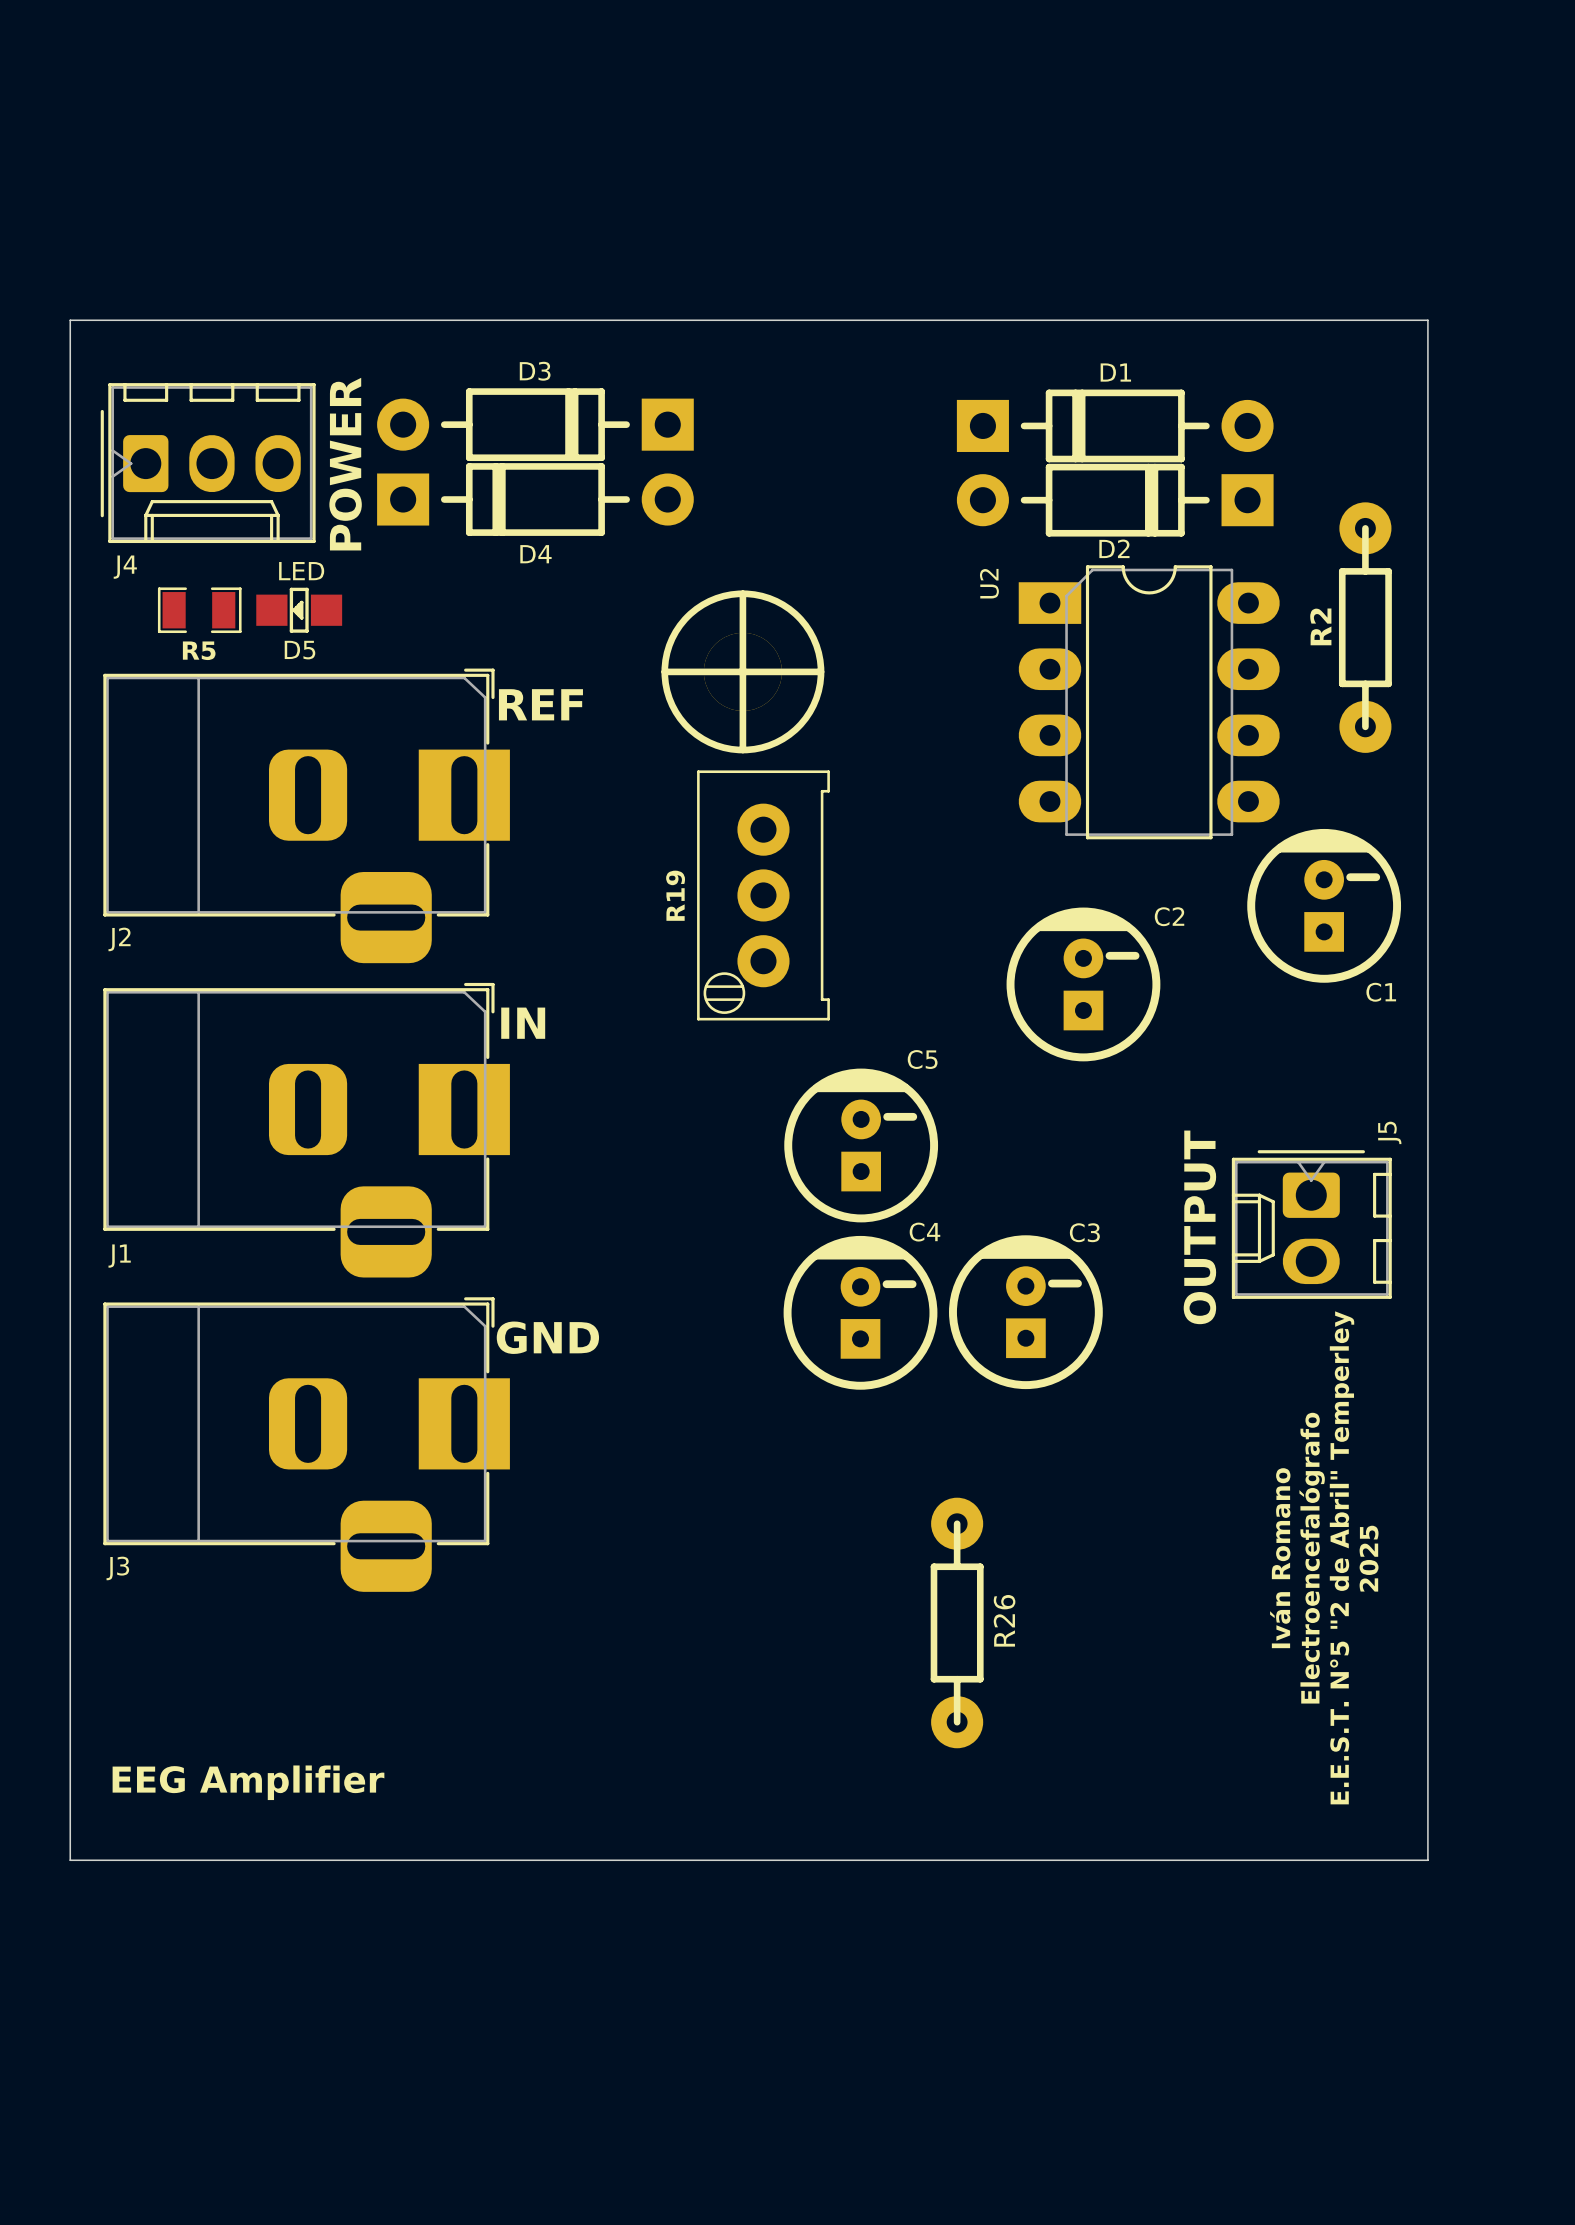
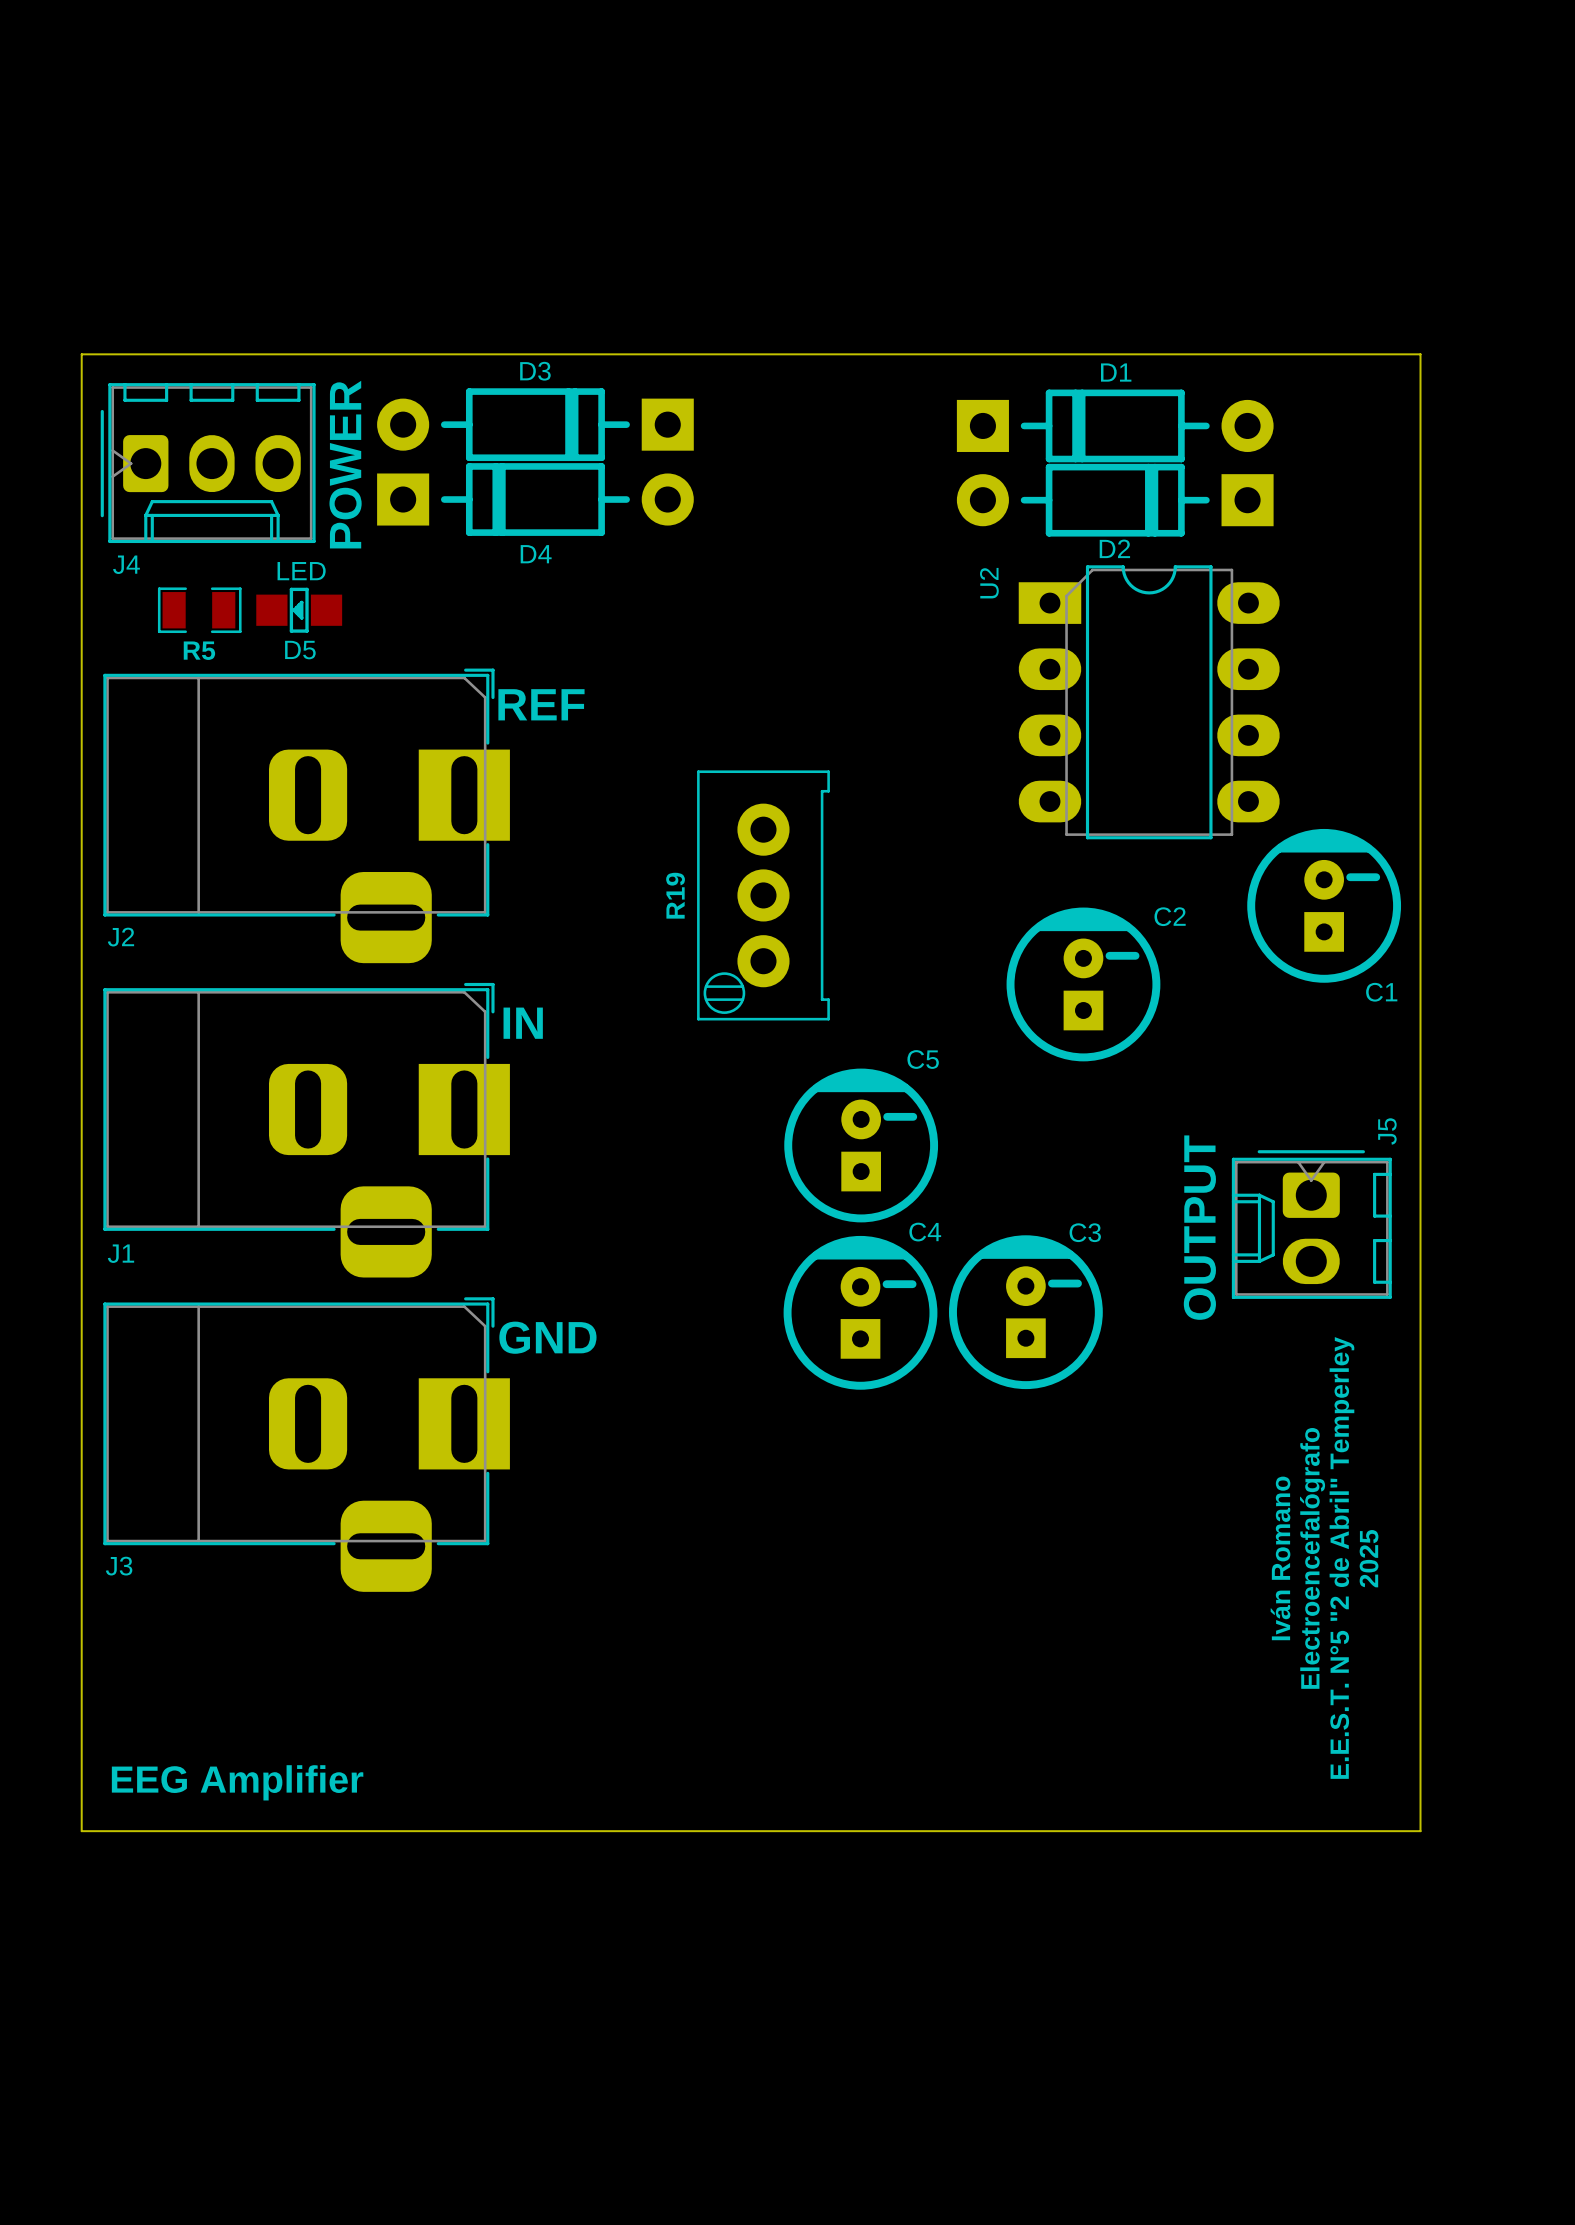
board edge: (70, 320) (1427, 320) (1427, 1860) (70, 1860) (70, 320) -> (81, 354) (81, 1831) (1420, 1831) (1420, 354) (81, 354)
R2: (1365, 627) -> none
part: (742, 671) -> none
R26: (957, 1622) -> none

